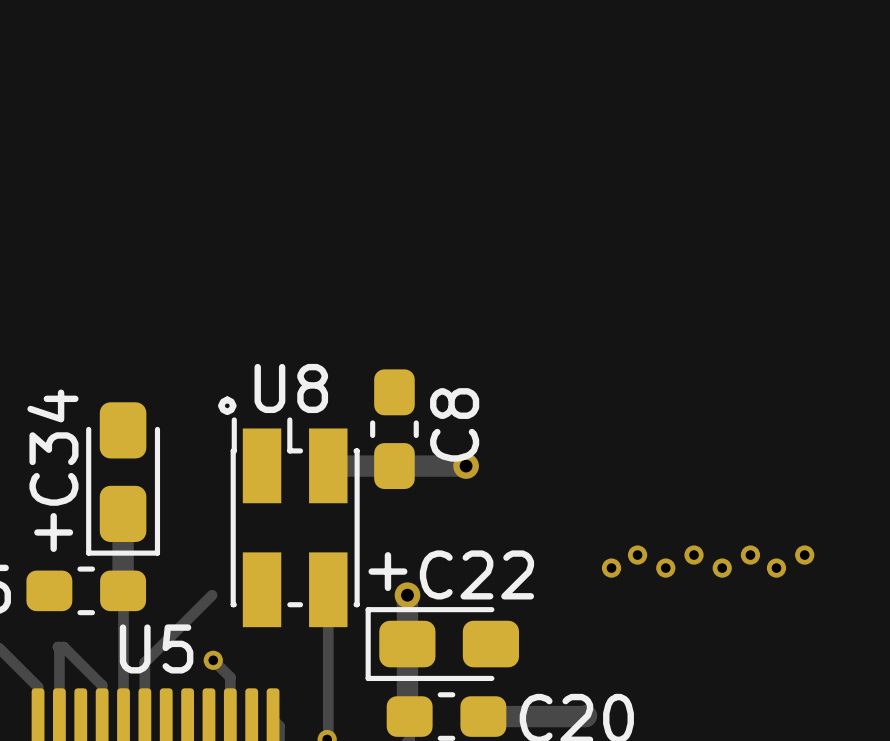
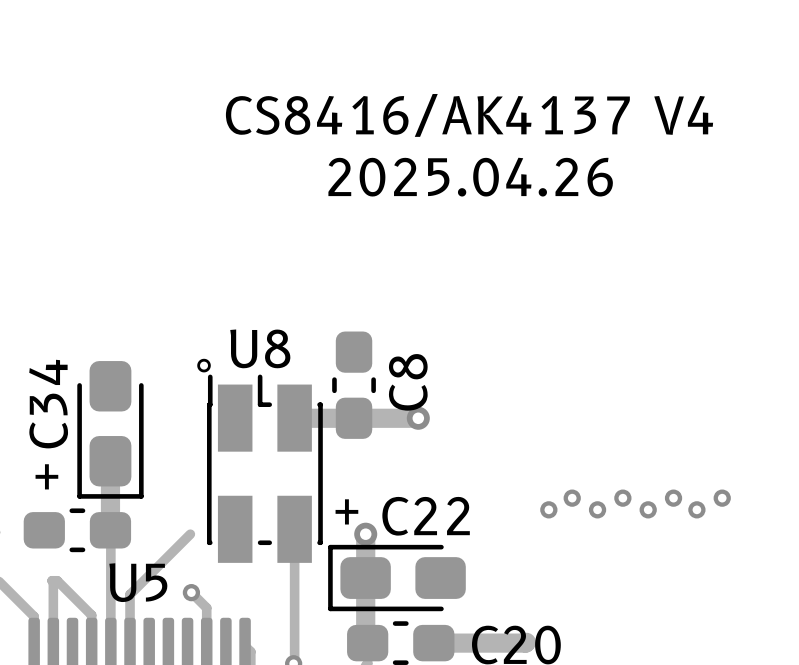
text: none -> CS8416/AK4137 V4 (469, 115)
text: none -> 2025.04.26 (470, 177)

